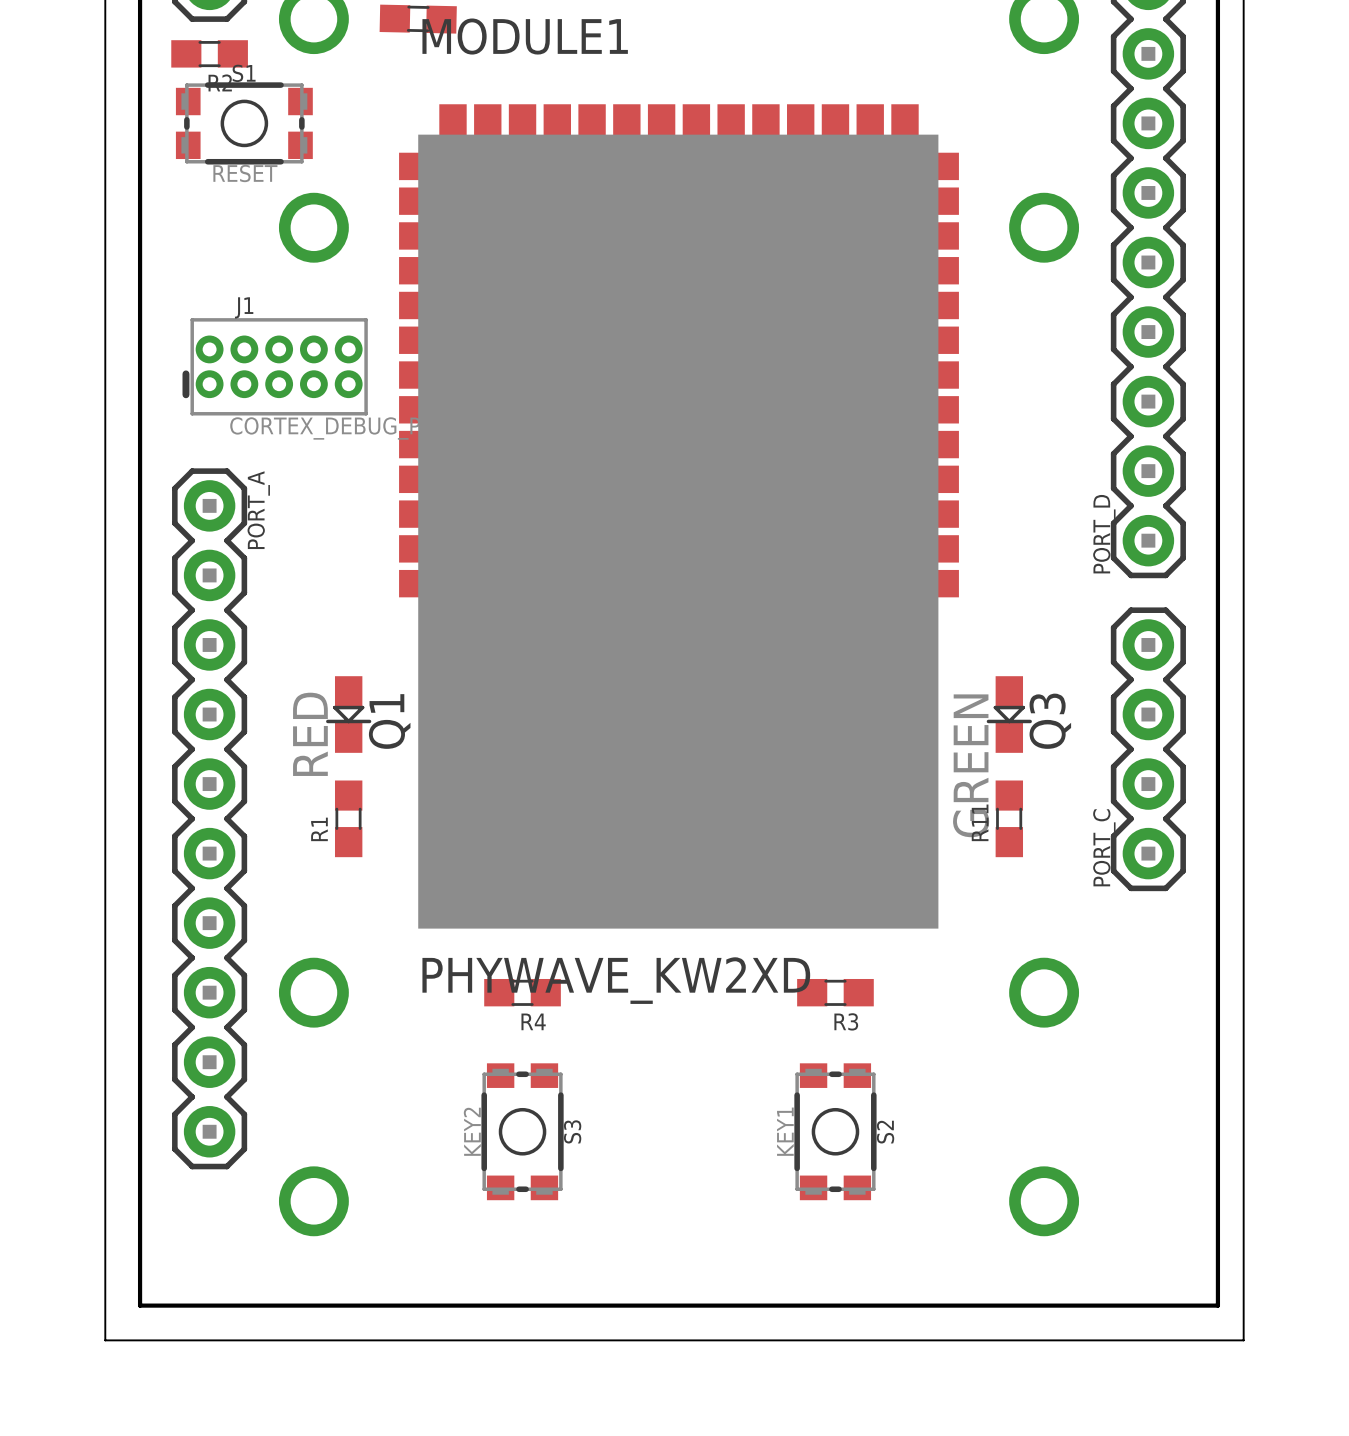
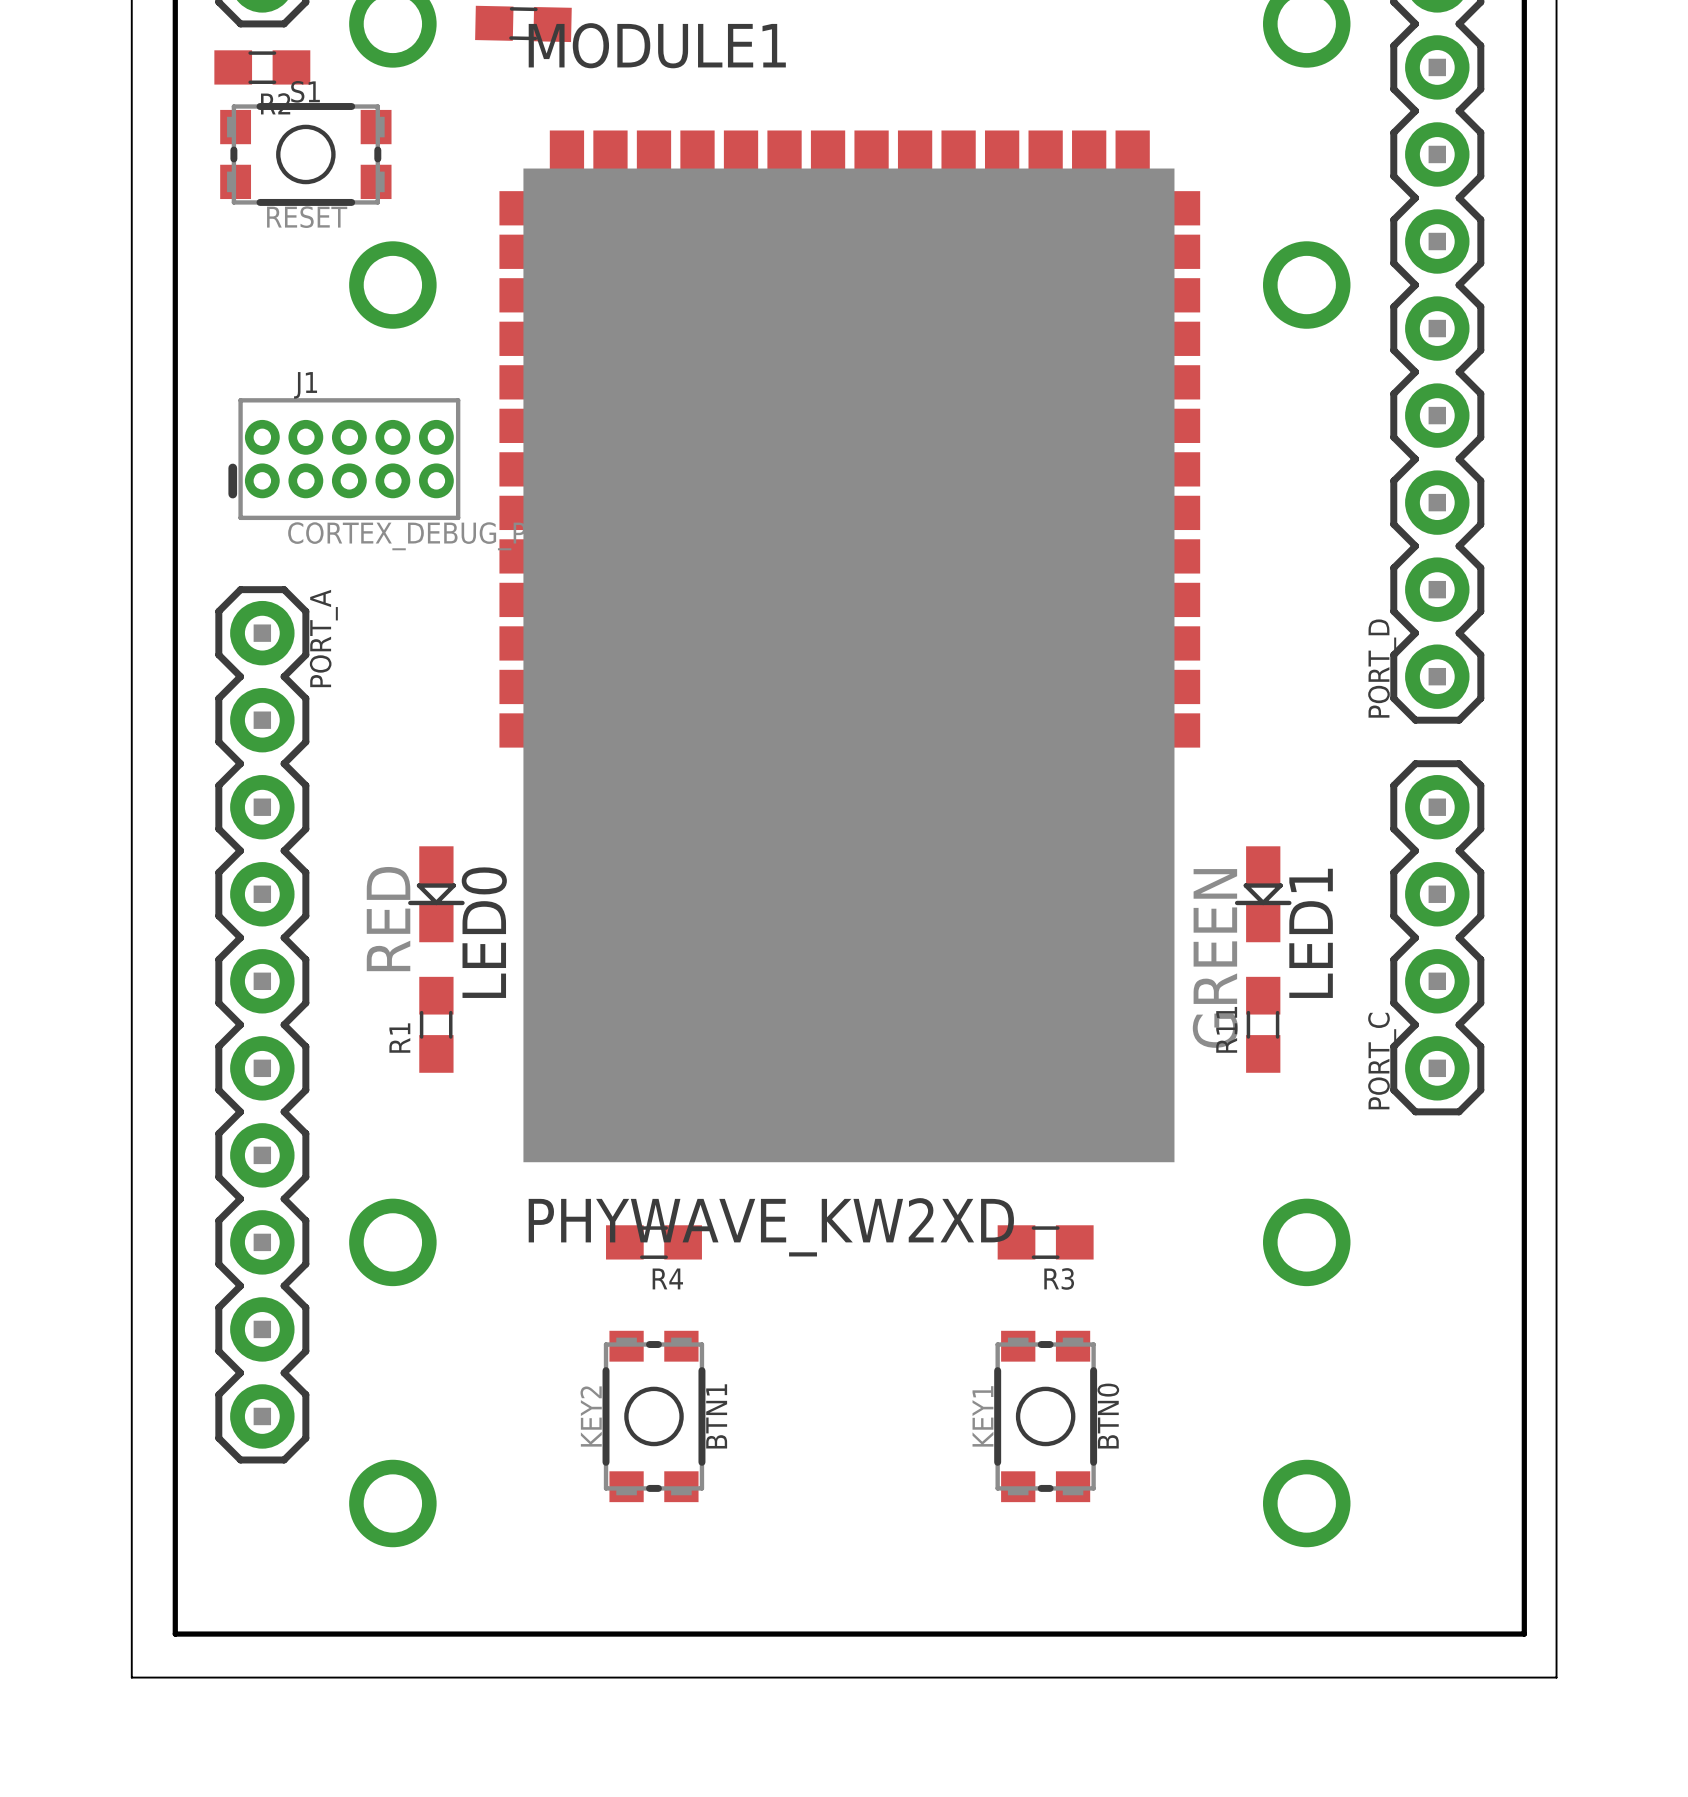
Q1 name: Q1 (389, 721) -> LED0 (484, 932)
Q3 name: Q3 (1050, 721) -> LED1 (1311, 933)
S3 name: S3 (572, 1131) -> BTN1 (716, 1416)
S2 name: S2 (885, 1132) -> BTN0 (1108, 1416)

